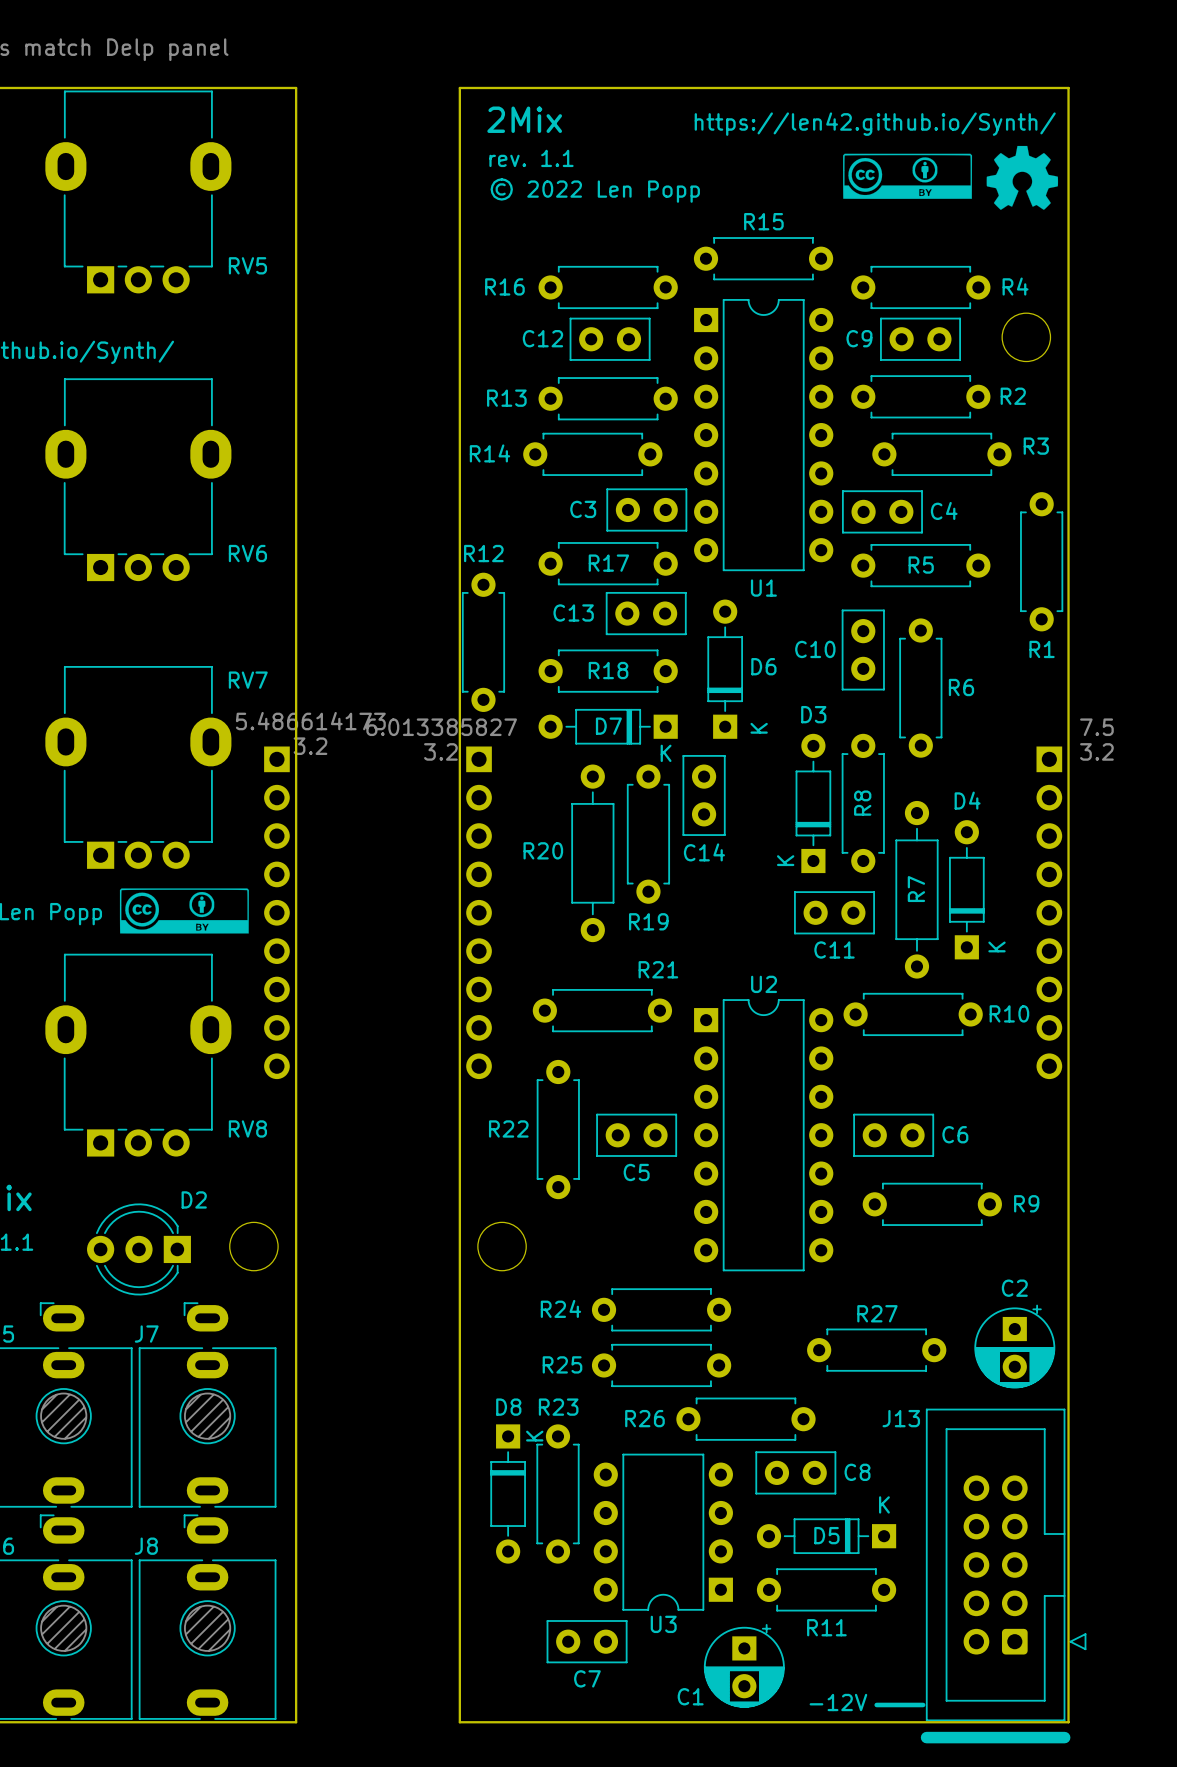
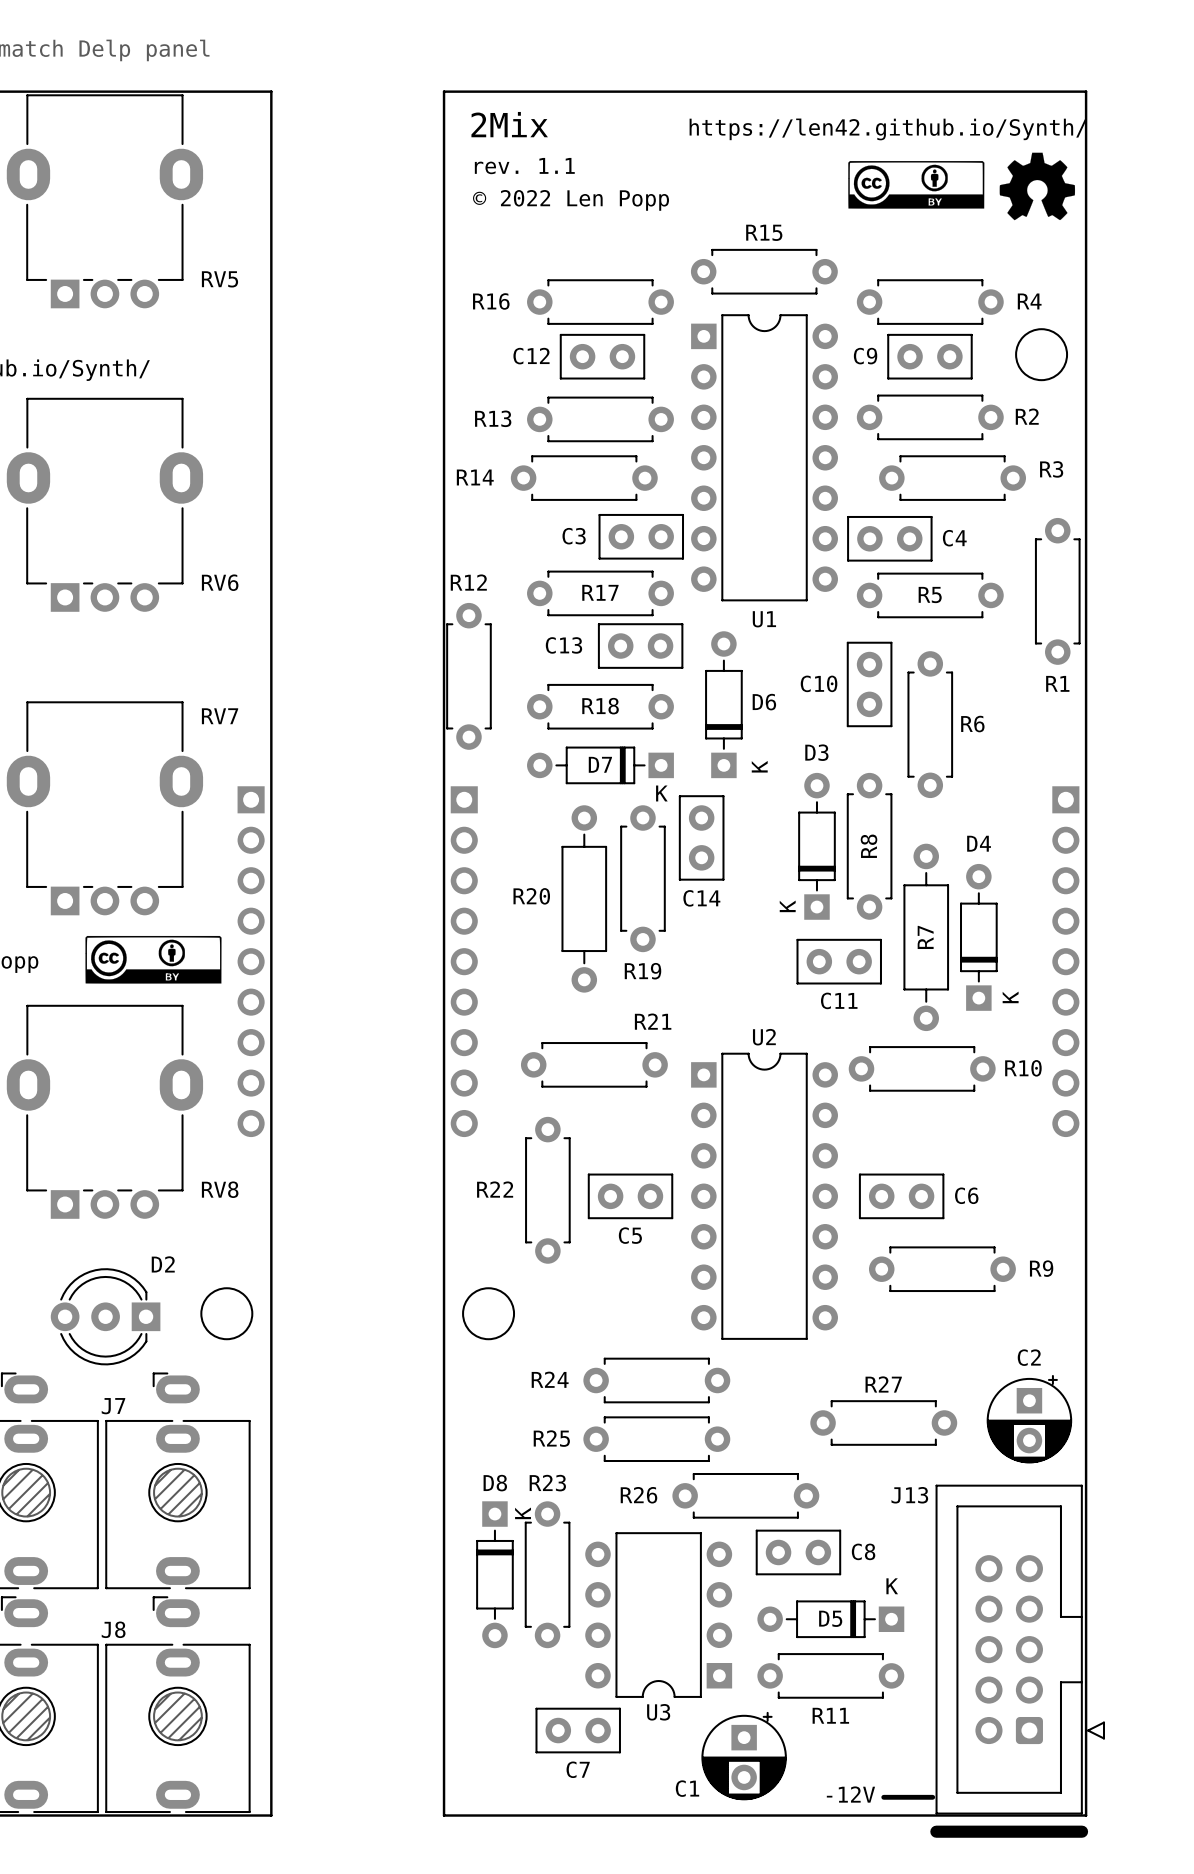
text: 5.486614173 (310, 721) -> none
text: 6.013385827 (441, 727) -> none
text: 7.5 (1096, 727) -> none
text: 3.2 (310, 746) -> none
text: 3.2 (440, 751) -> none
text: 3.2 (1096, 751) -> none

